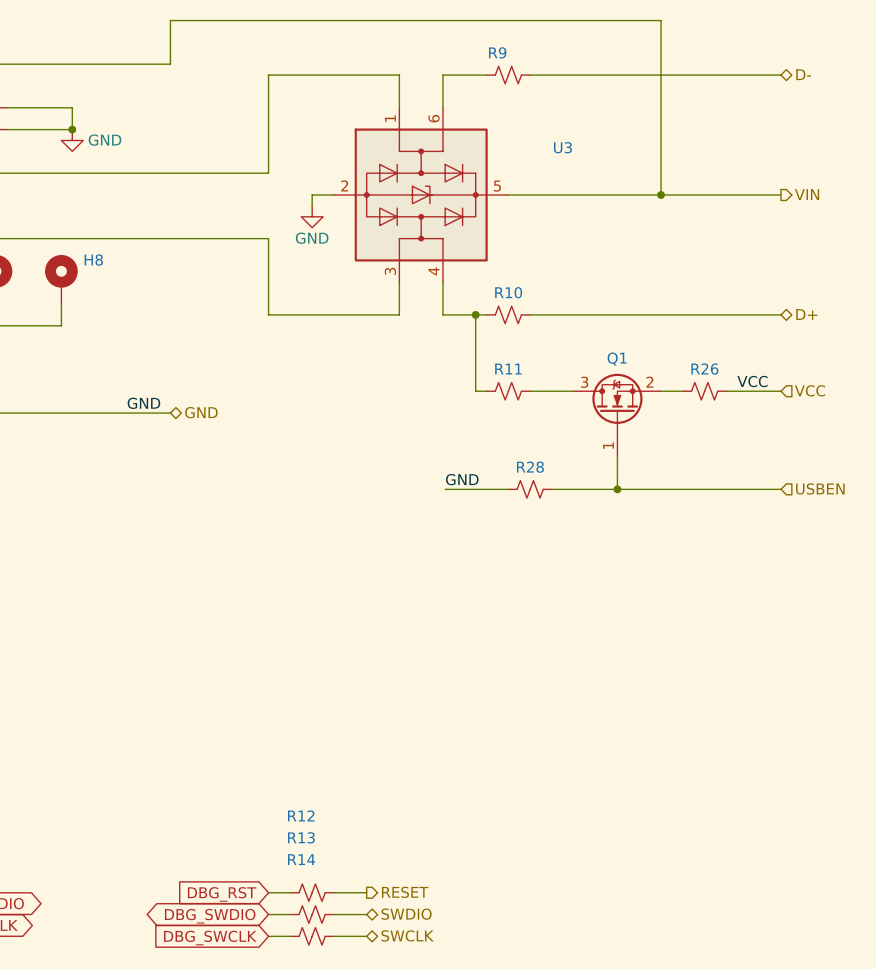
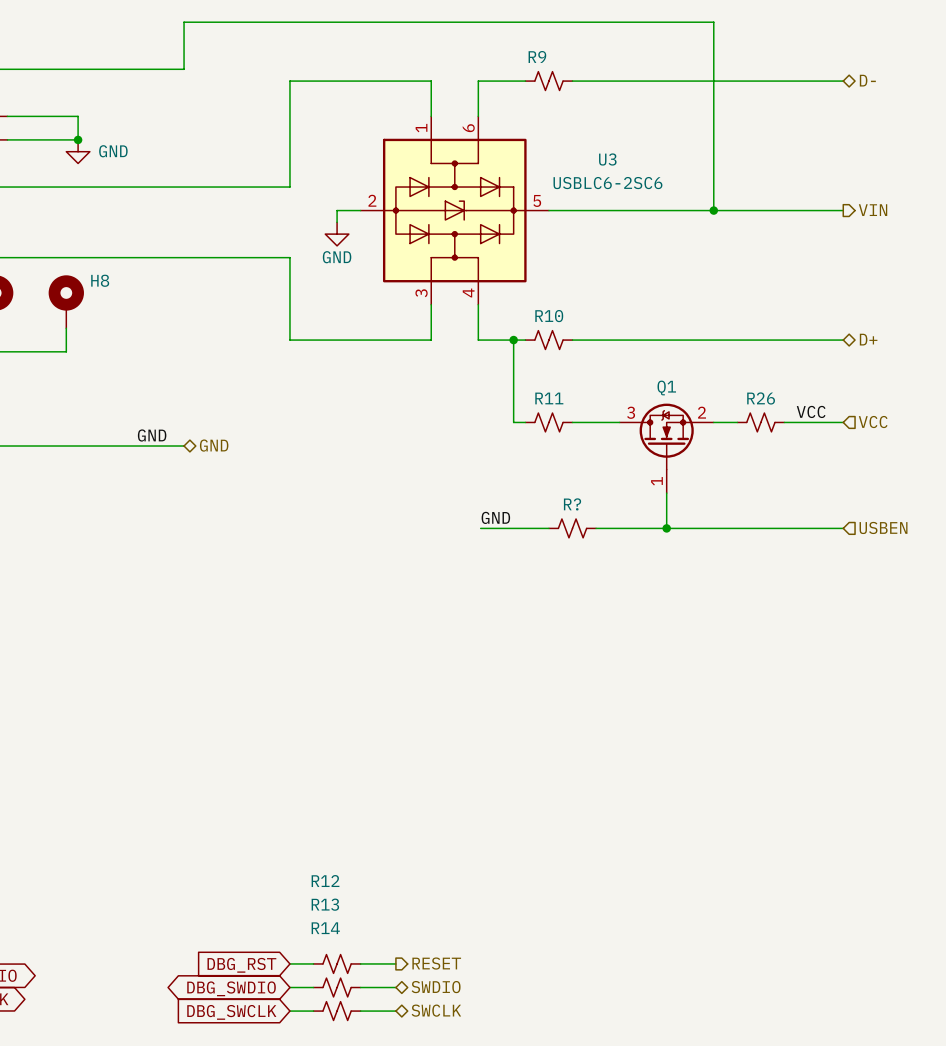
U3 value: none -> USBLC6-2SC6 (607, 183)
R28 name: R28 (530, 467) -> R? (572, 504)

